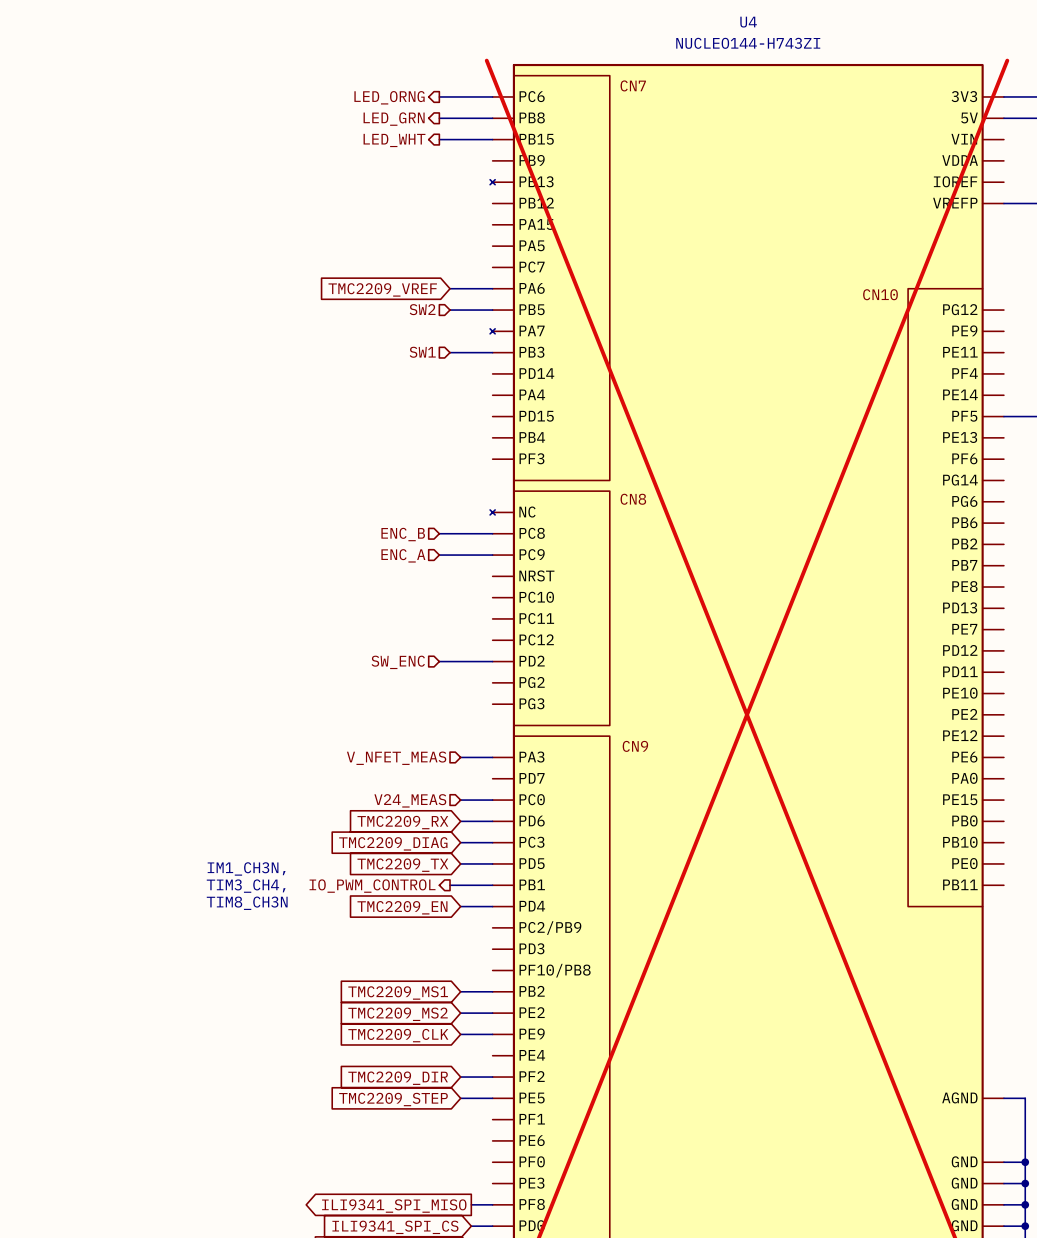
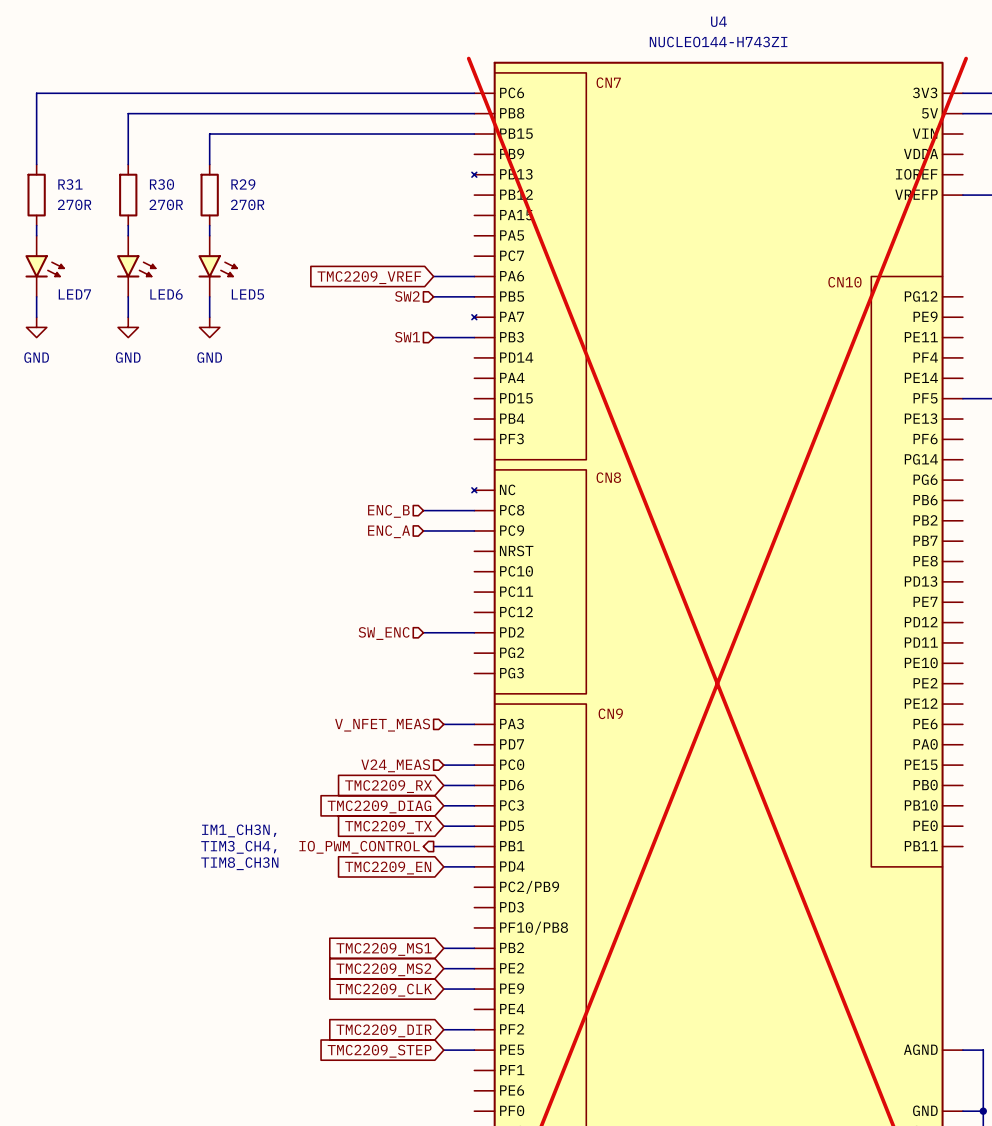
wire: none -> (423, 93) (36, 93) (36, 164)
hierarchical label: LED_ORNG (389, 97) -> none
wire: none -> (423, 113) (128, 113) (128, 164)
hierarchical label: LED_GRN (394, 119) -> none
wire: none -> (423, 134) (209, 134) (209, 164)
hierarchical label: LED_WHT (394, 140) -> none
R31: none -> 270R (36, 195)
R30: none -> 270R (128, 195)
R29: none -> 270R (209, 195)
wire: none -> (36, 225) (36, 235)
wire: none -> (128, 225) (128, 235)
wire: none -> (209, 225) (209, 235)
LED7: none -> (45, 266)
LED6: none -> (136, 266)
LED5: none -> (218, 266)
wire: none -> (36, 296) (36, 317)
wire: none -> (128, 296) (128, 317)
wire: none -> (209, 296) (209, 317)
power symbol: none -> GND (36, 327)
power symbol: none -> GND (128, 327)
power symbol: none -> GND (209, 327)

